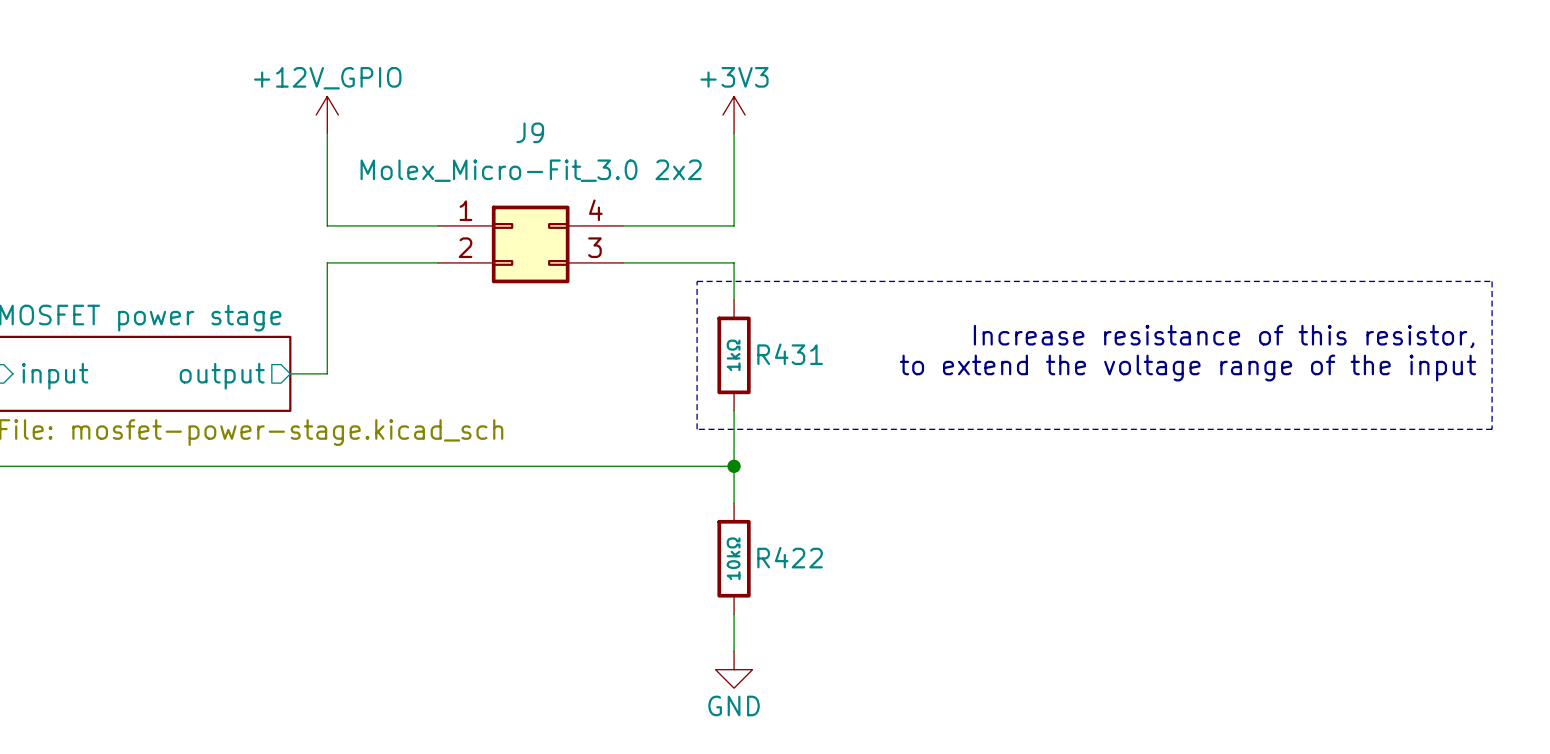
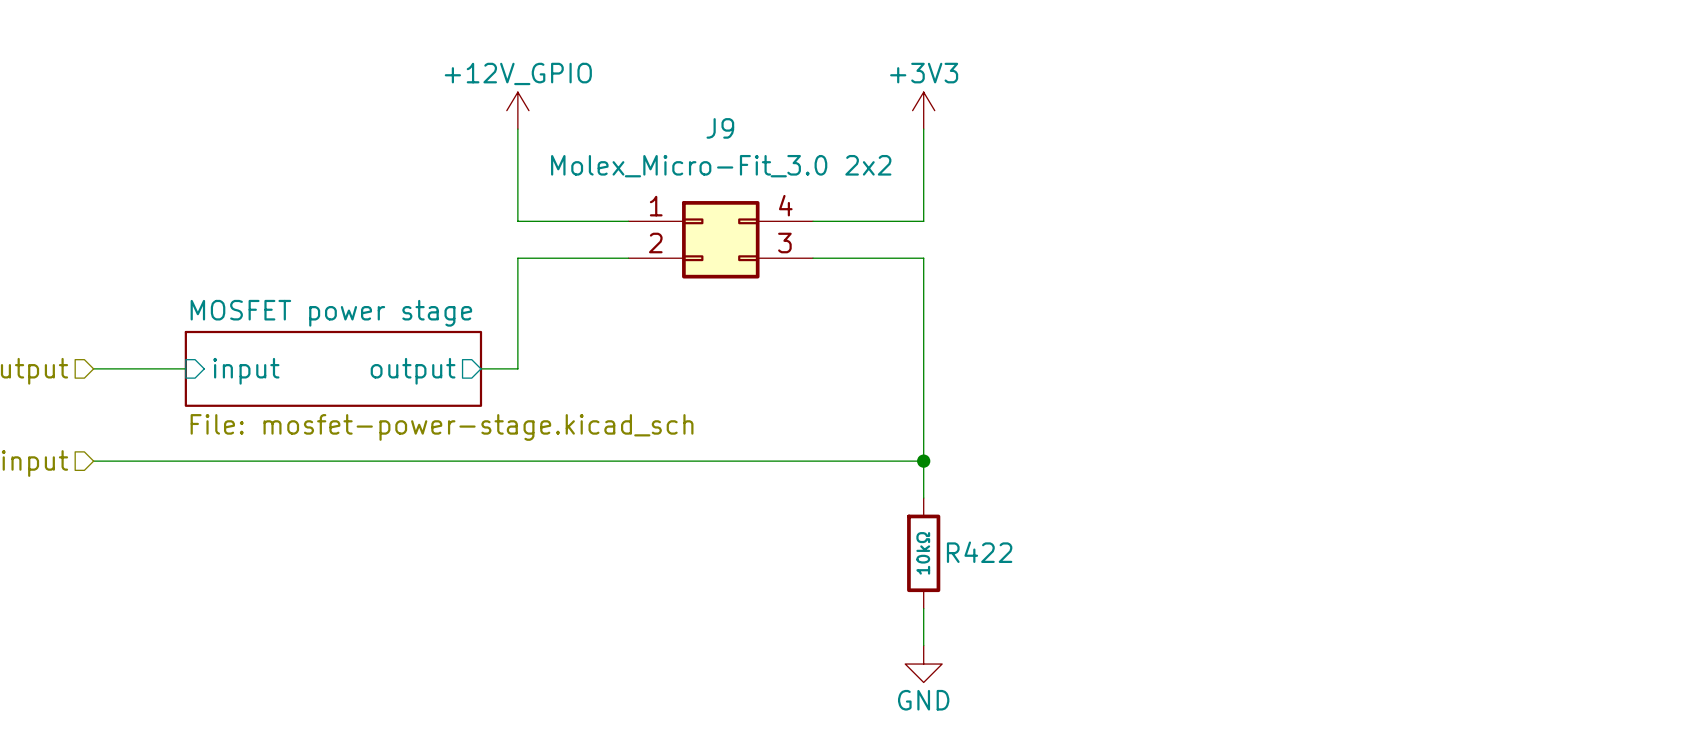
line: (697, 281) (1492, 281) (1492, 429) (697, 429) (697, 281) -> none
wire: none -> (923, 295) (923, 405)
text: Increase resistance of this resistor, (1224, 336) -> none
R431: 1kΩ (734, 355) -> none
text: to extend the voltage range of the input (1187, 368) -> none

